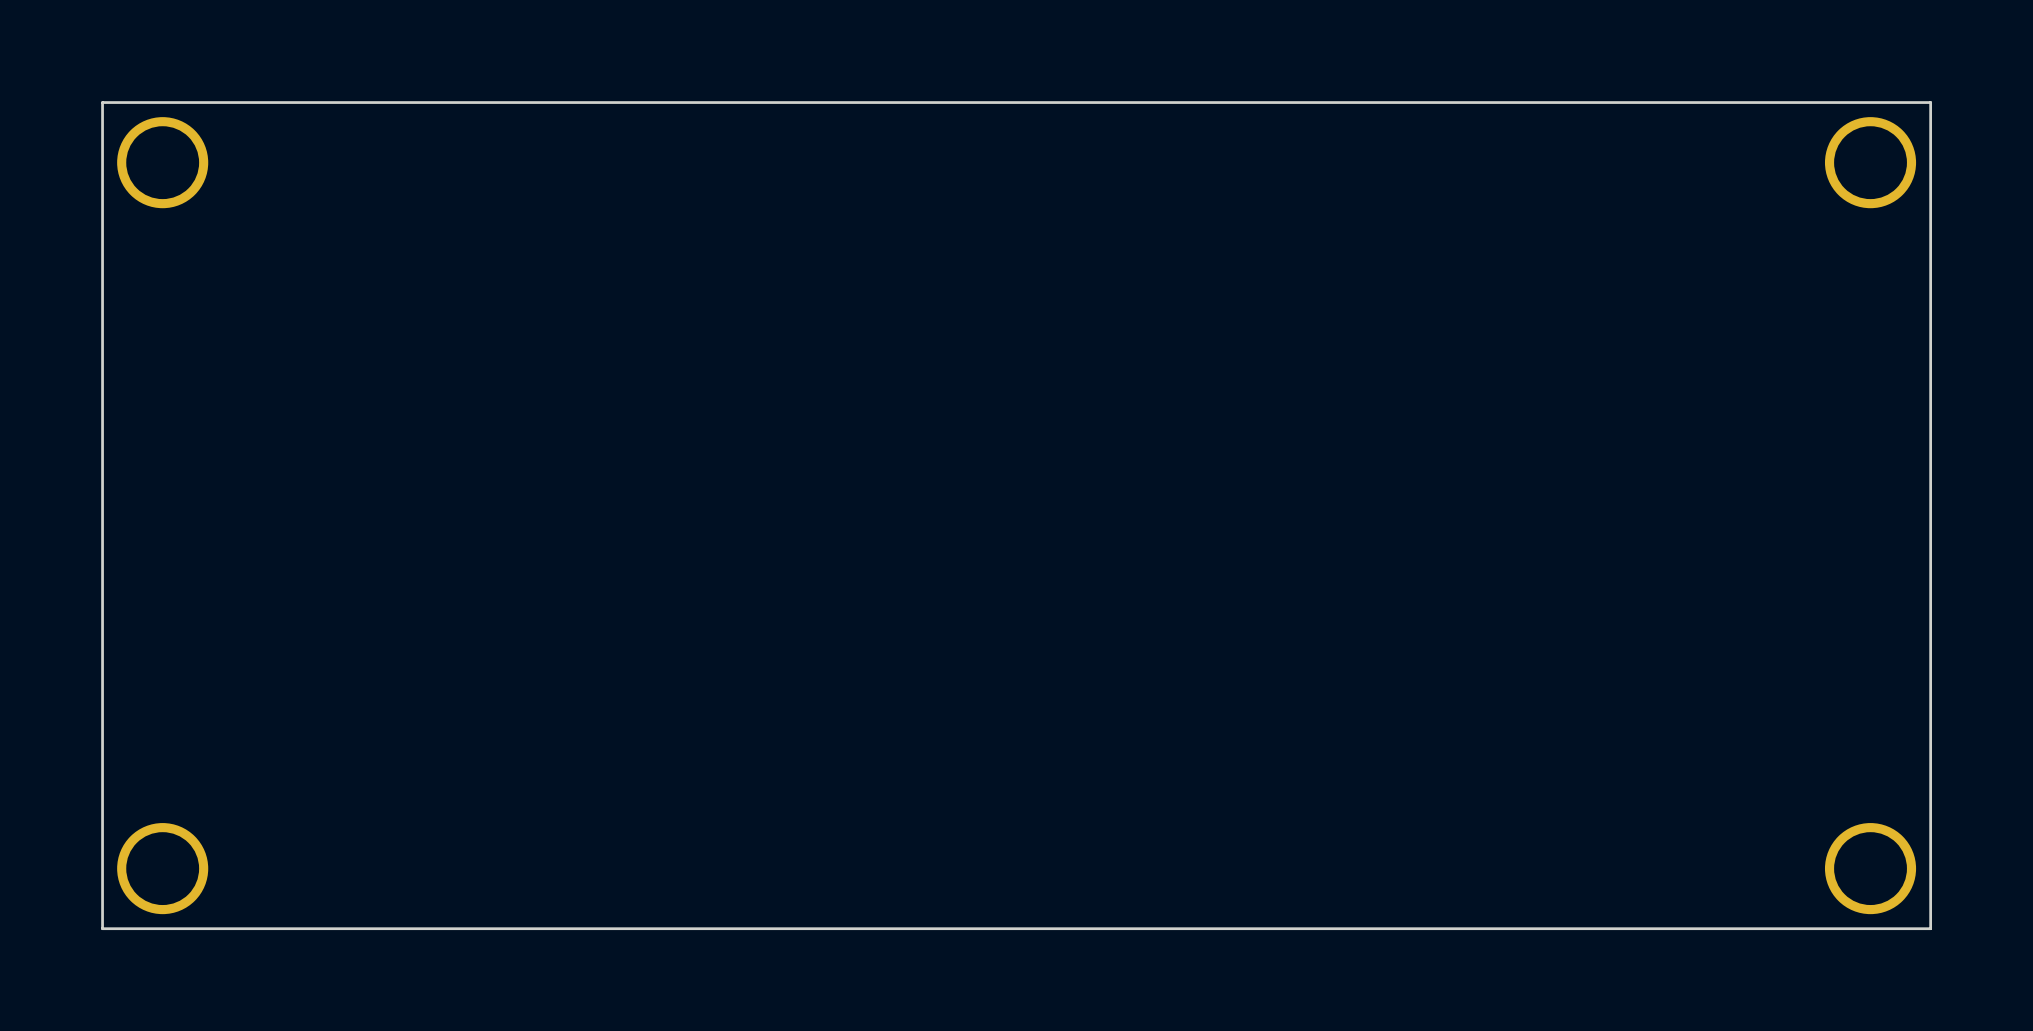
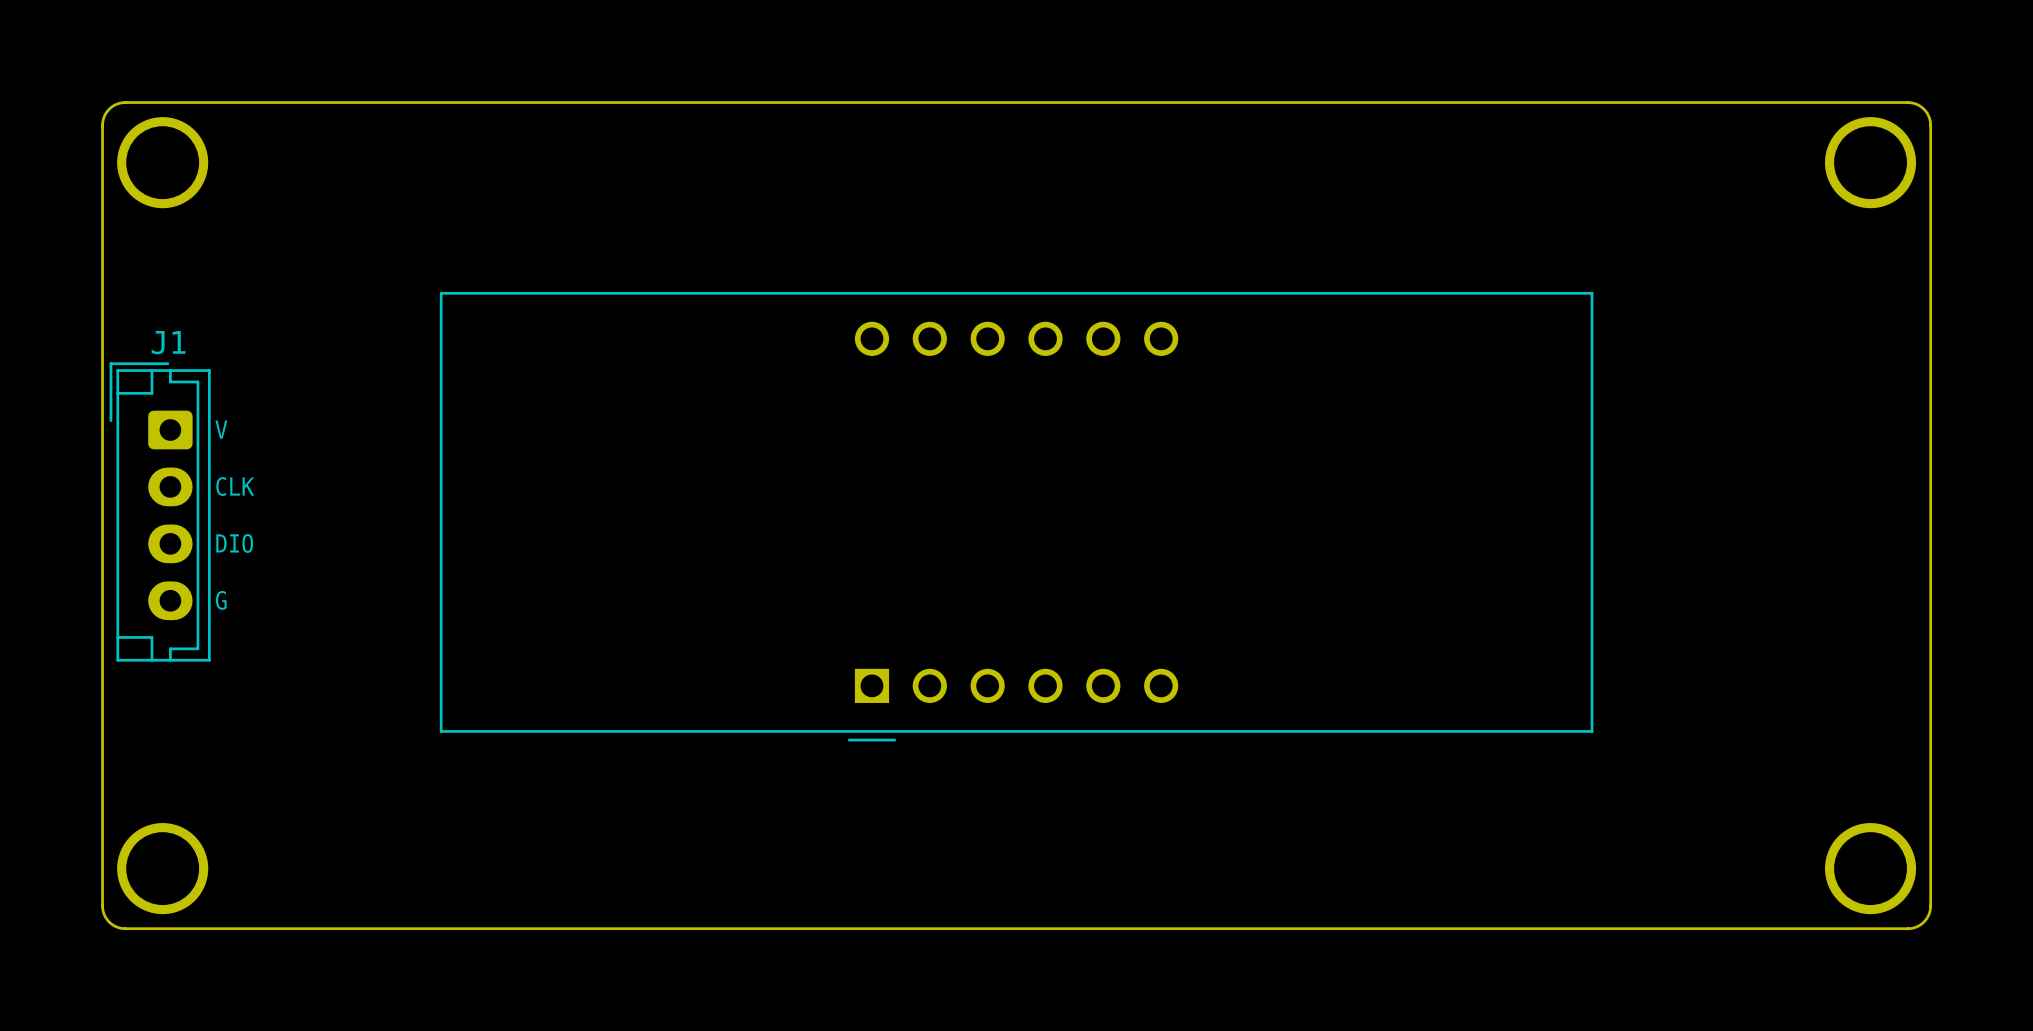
part footprint: [101, 101, 1933, 931] -> [101, 101, 1933, 931]
text: none -> V (221, 429)
text: none -> CLK (235, 486)
J1: none -> (160, 511)
part: none -> (1016, 516)
text: none -> DIO (234, 543)
text: none -> G (221, 600)

